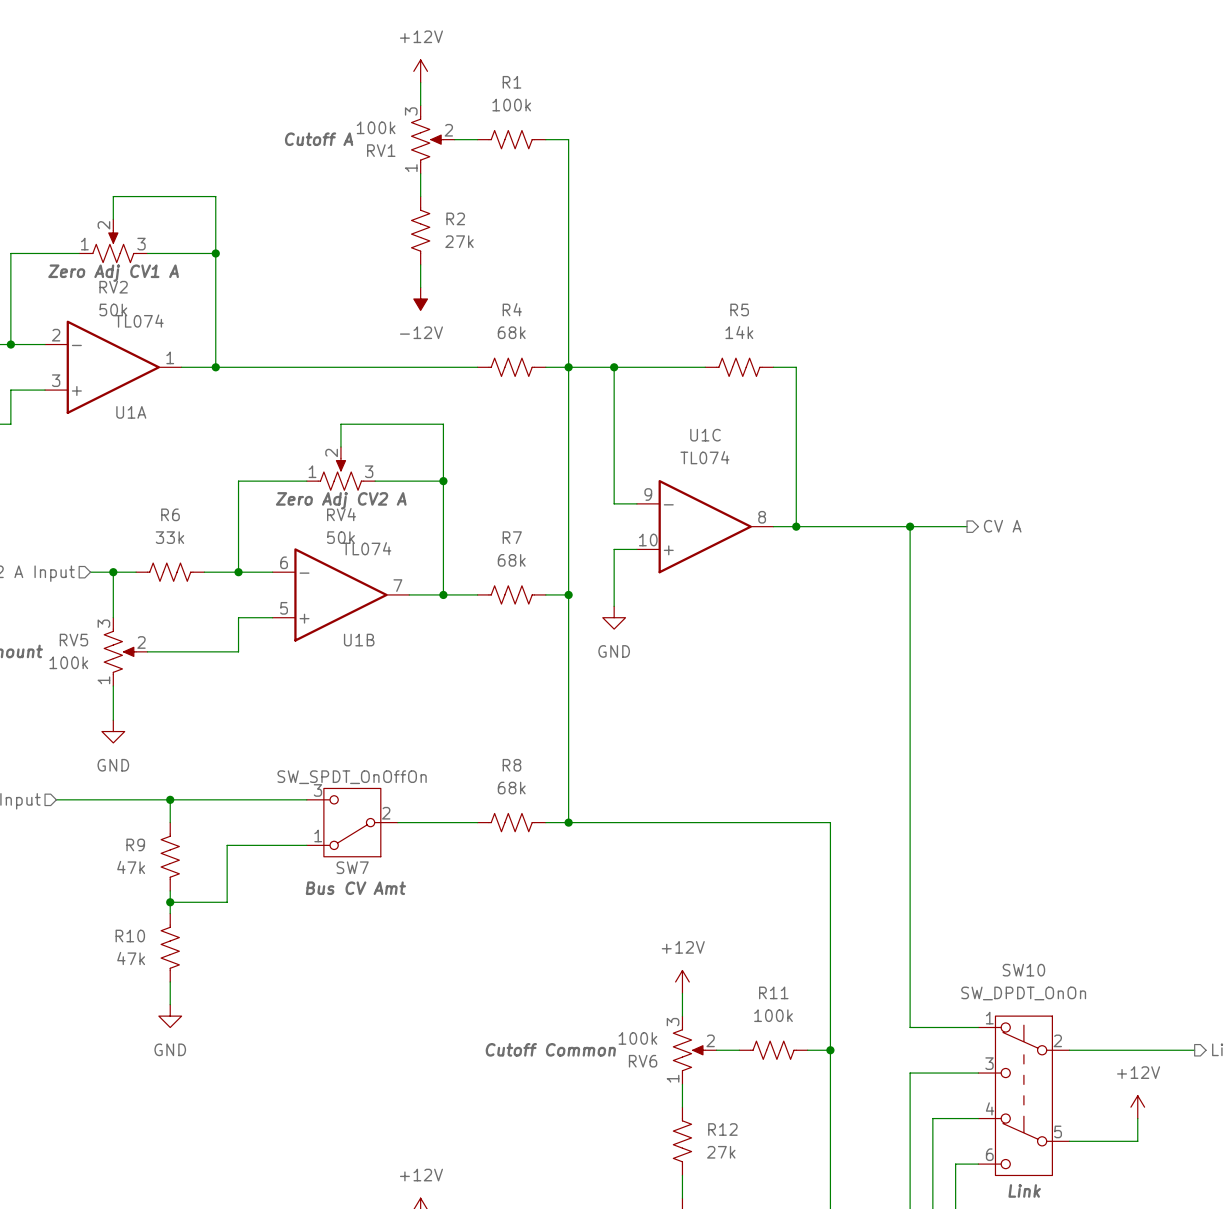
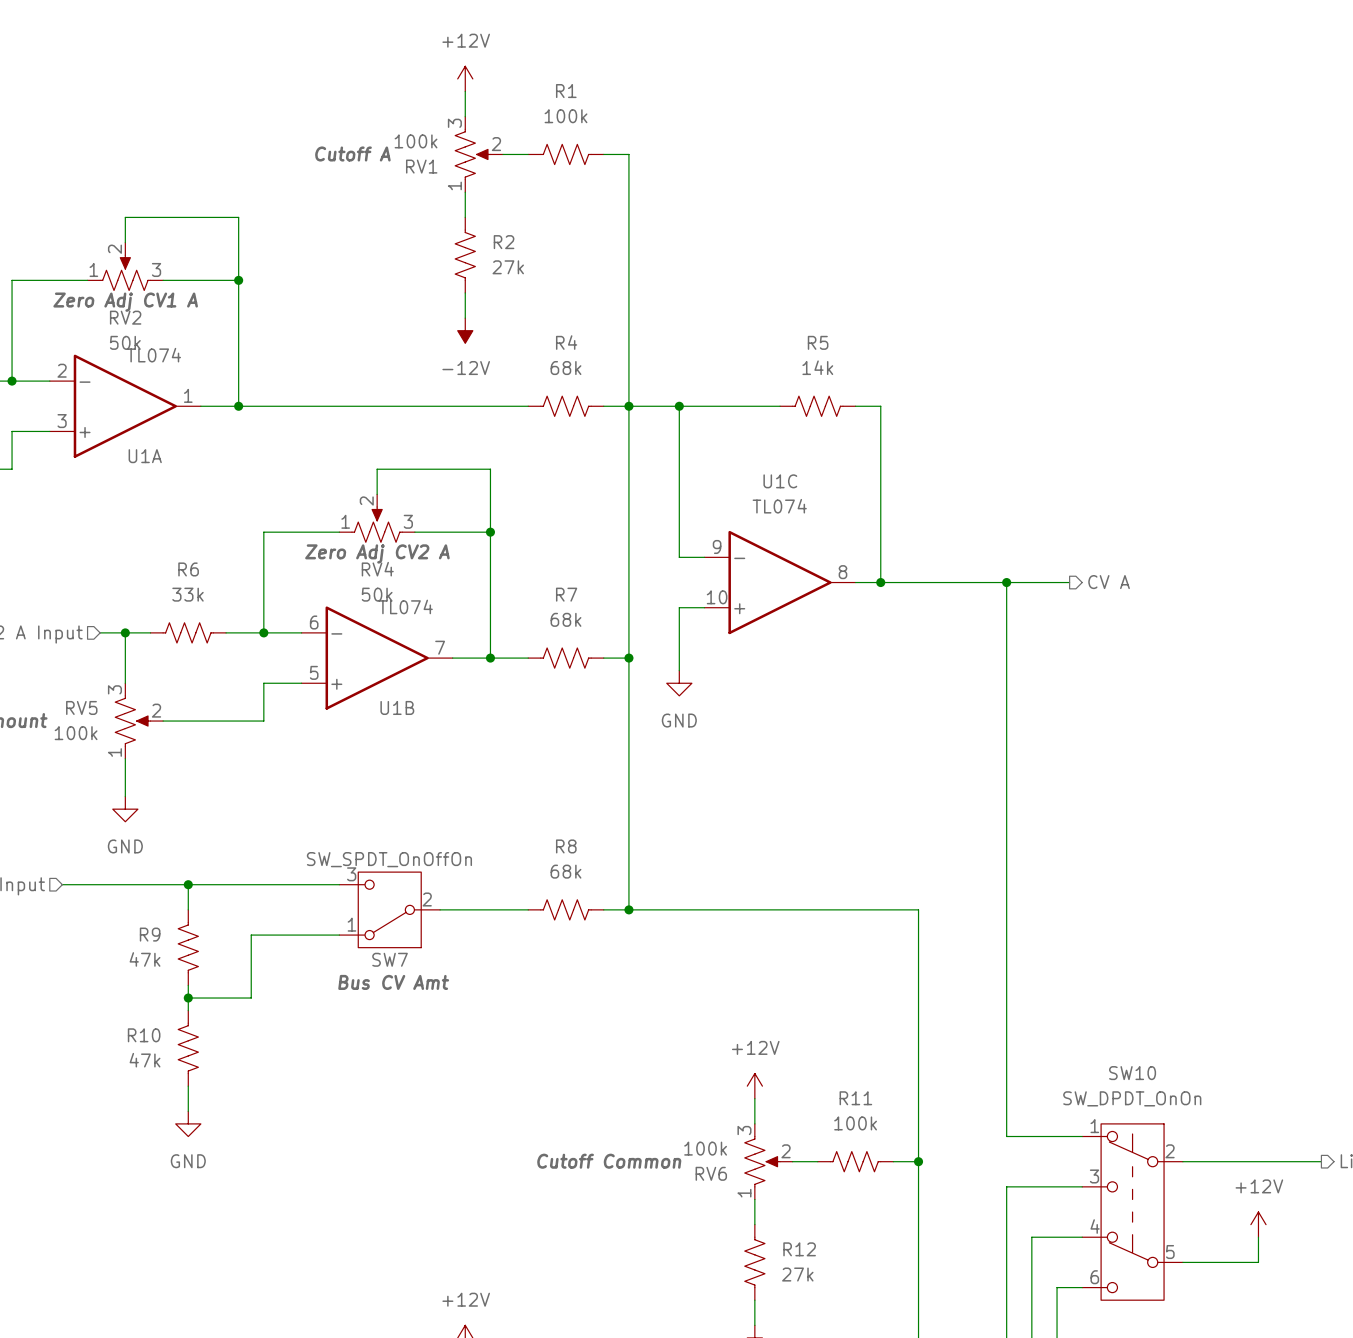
SW10 text: Link (1024, 1190) -> none

